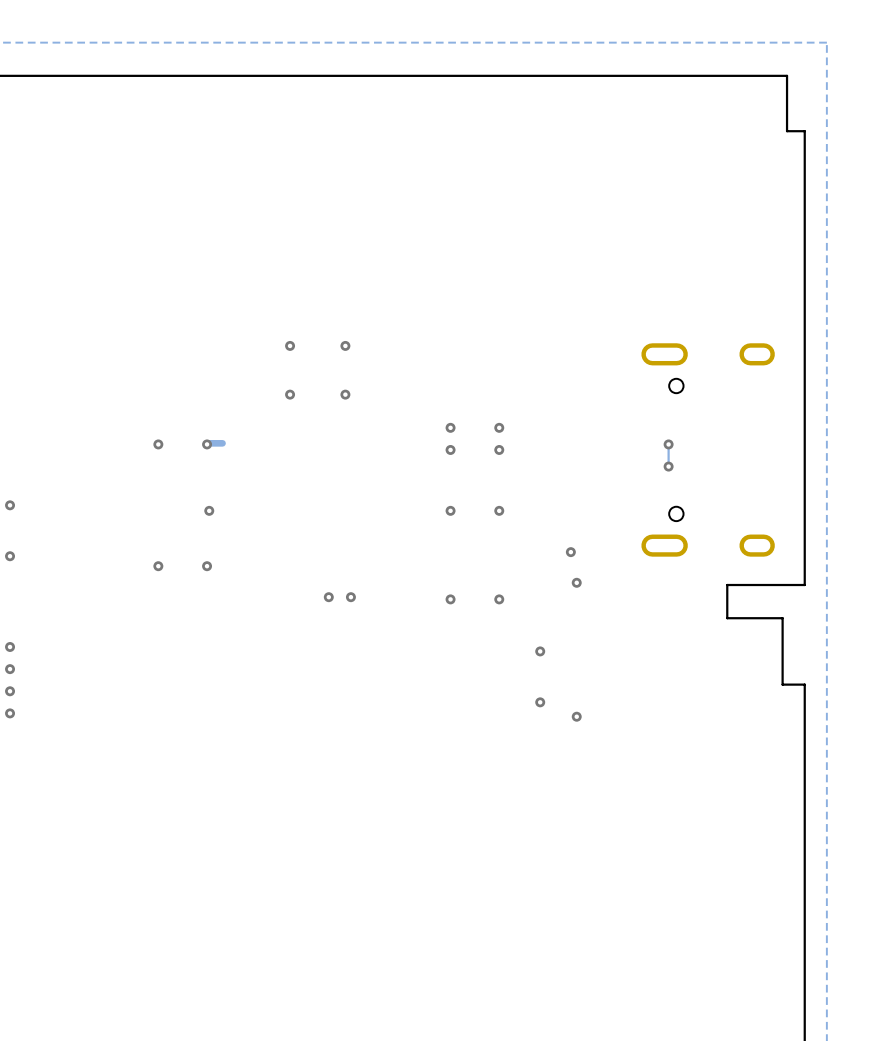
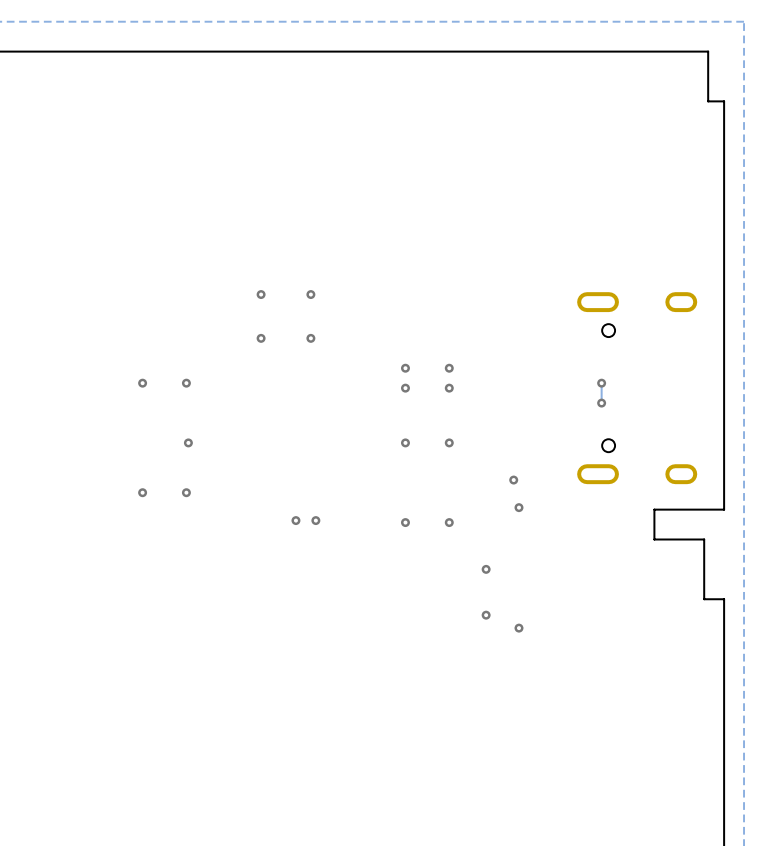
track: (222, 443) (207, 443) -> none
via: (10, 505) -> none
via: (10, 556) -> none
via: (10, 646) -> none
via: (10, 669) -> none
via: (10, 691) -> none
via: (10, 713) -> none

